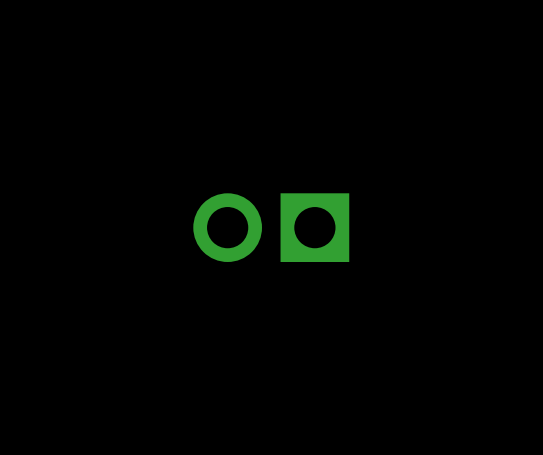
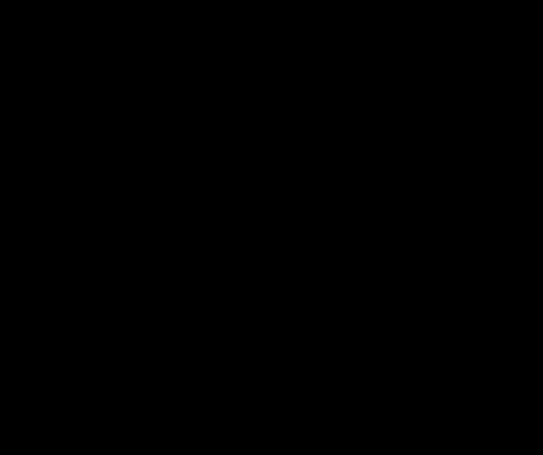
part: (271, 227) -> none

